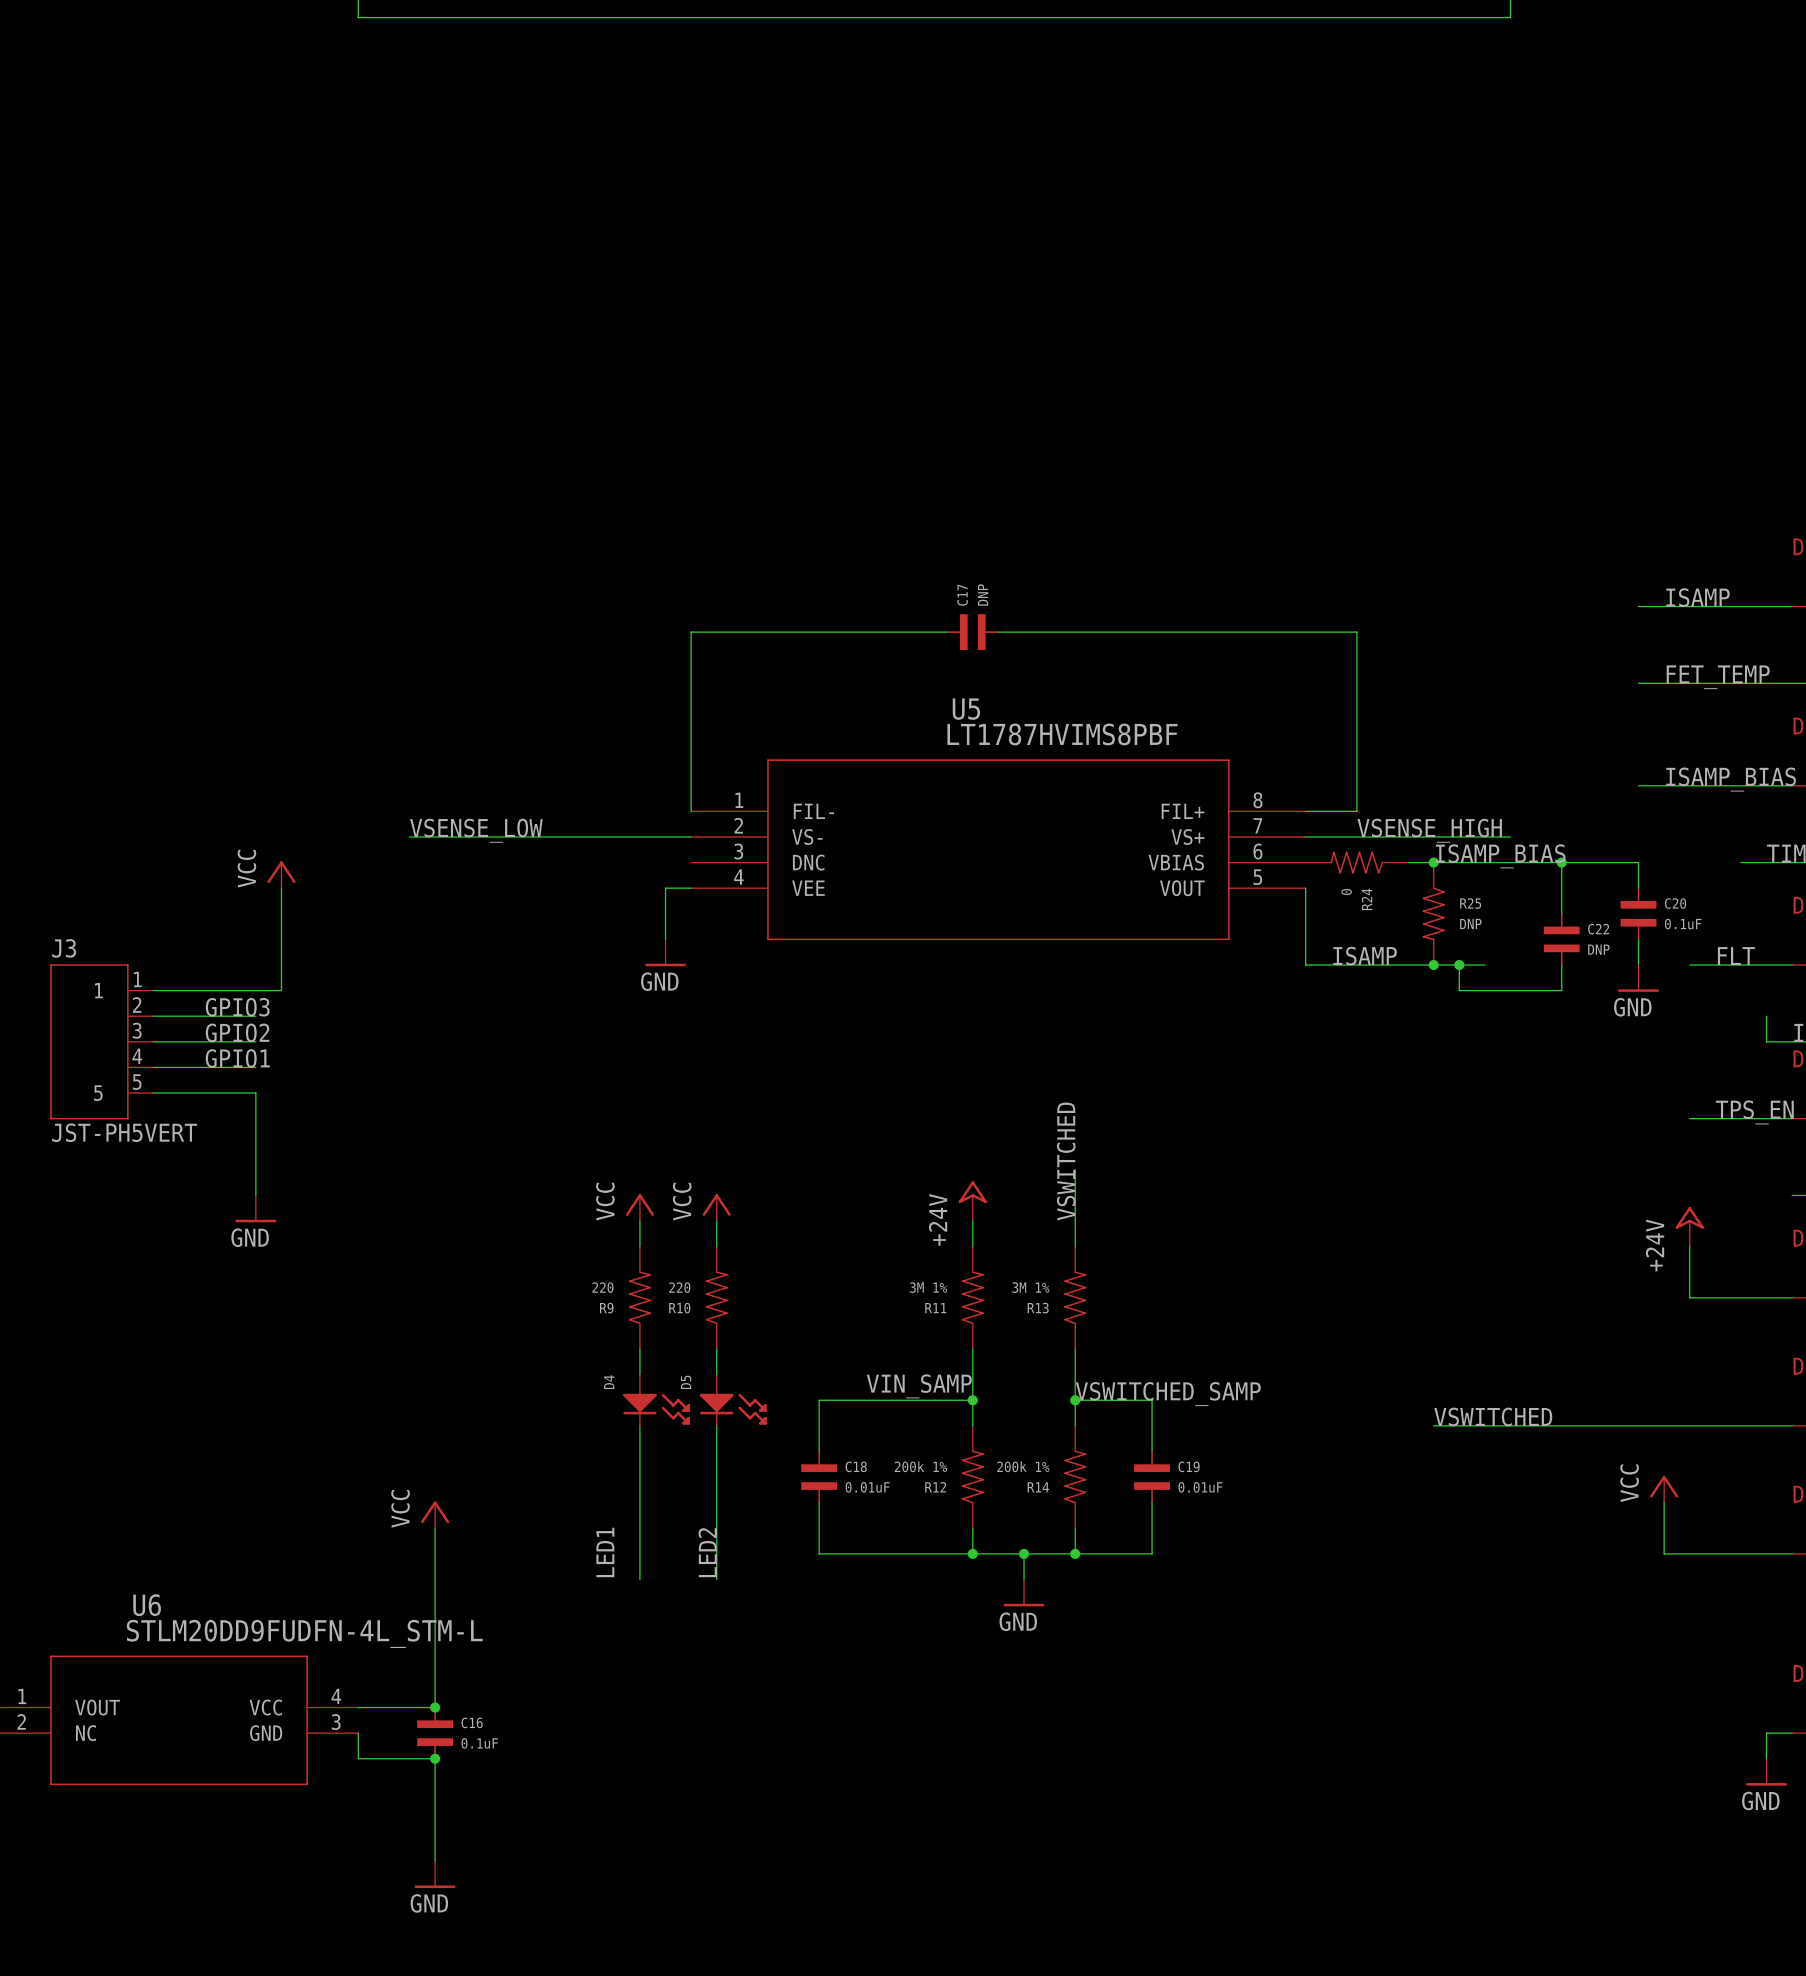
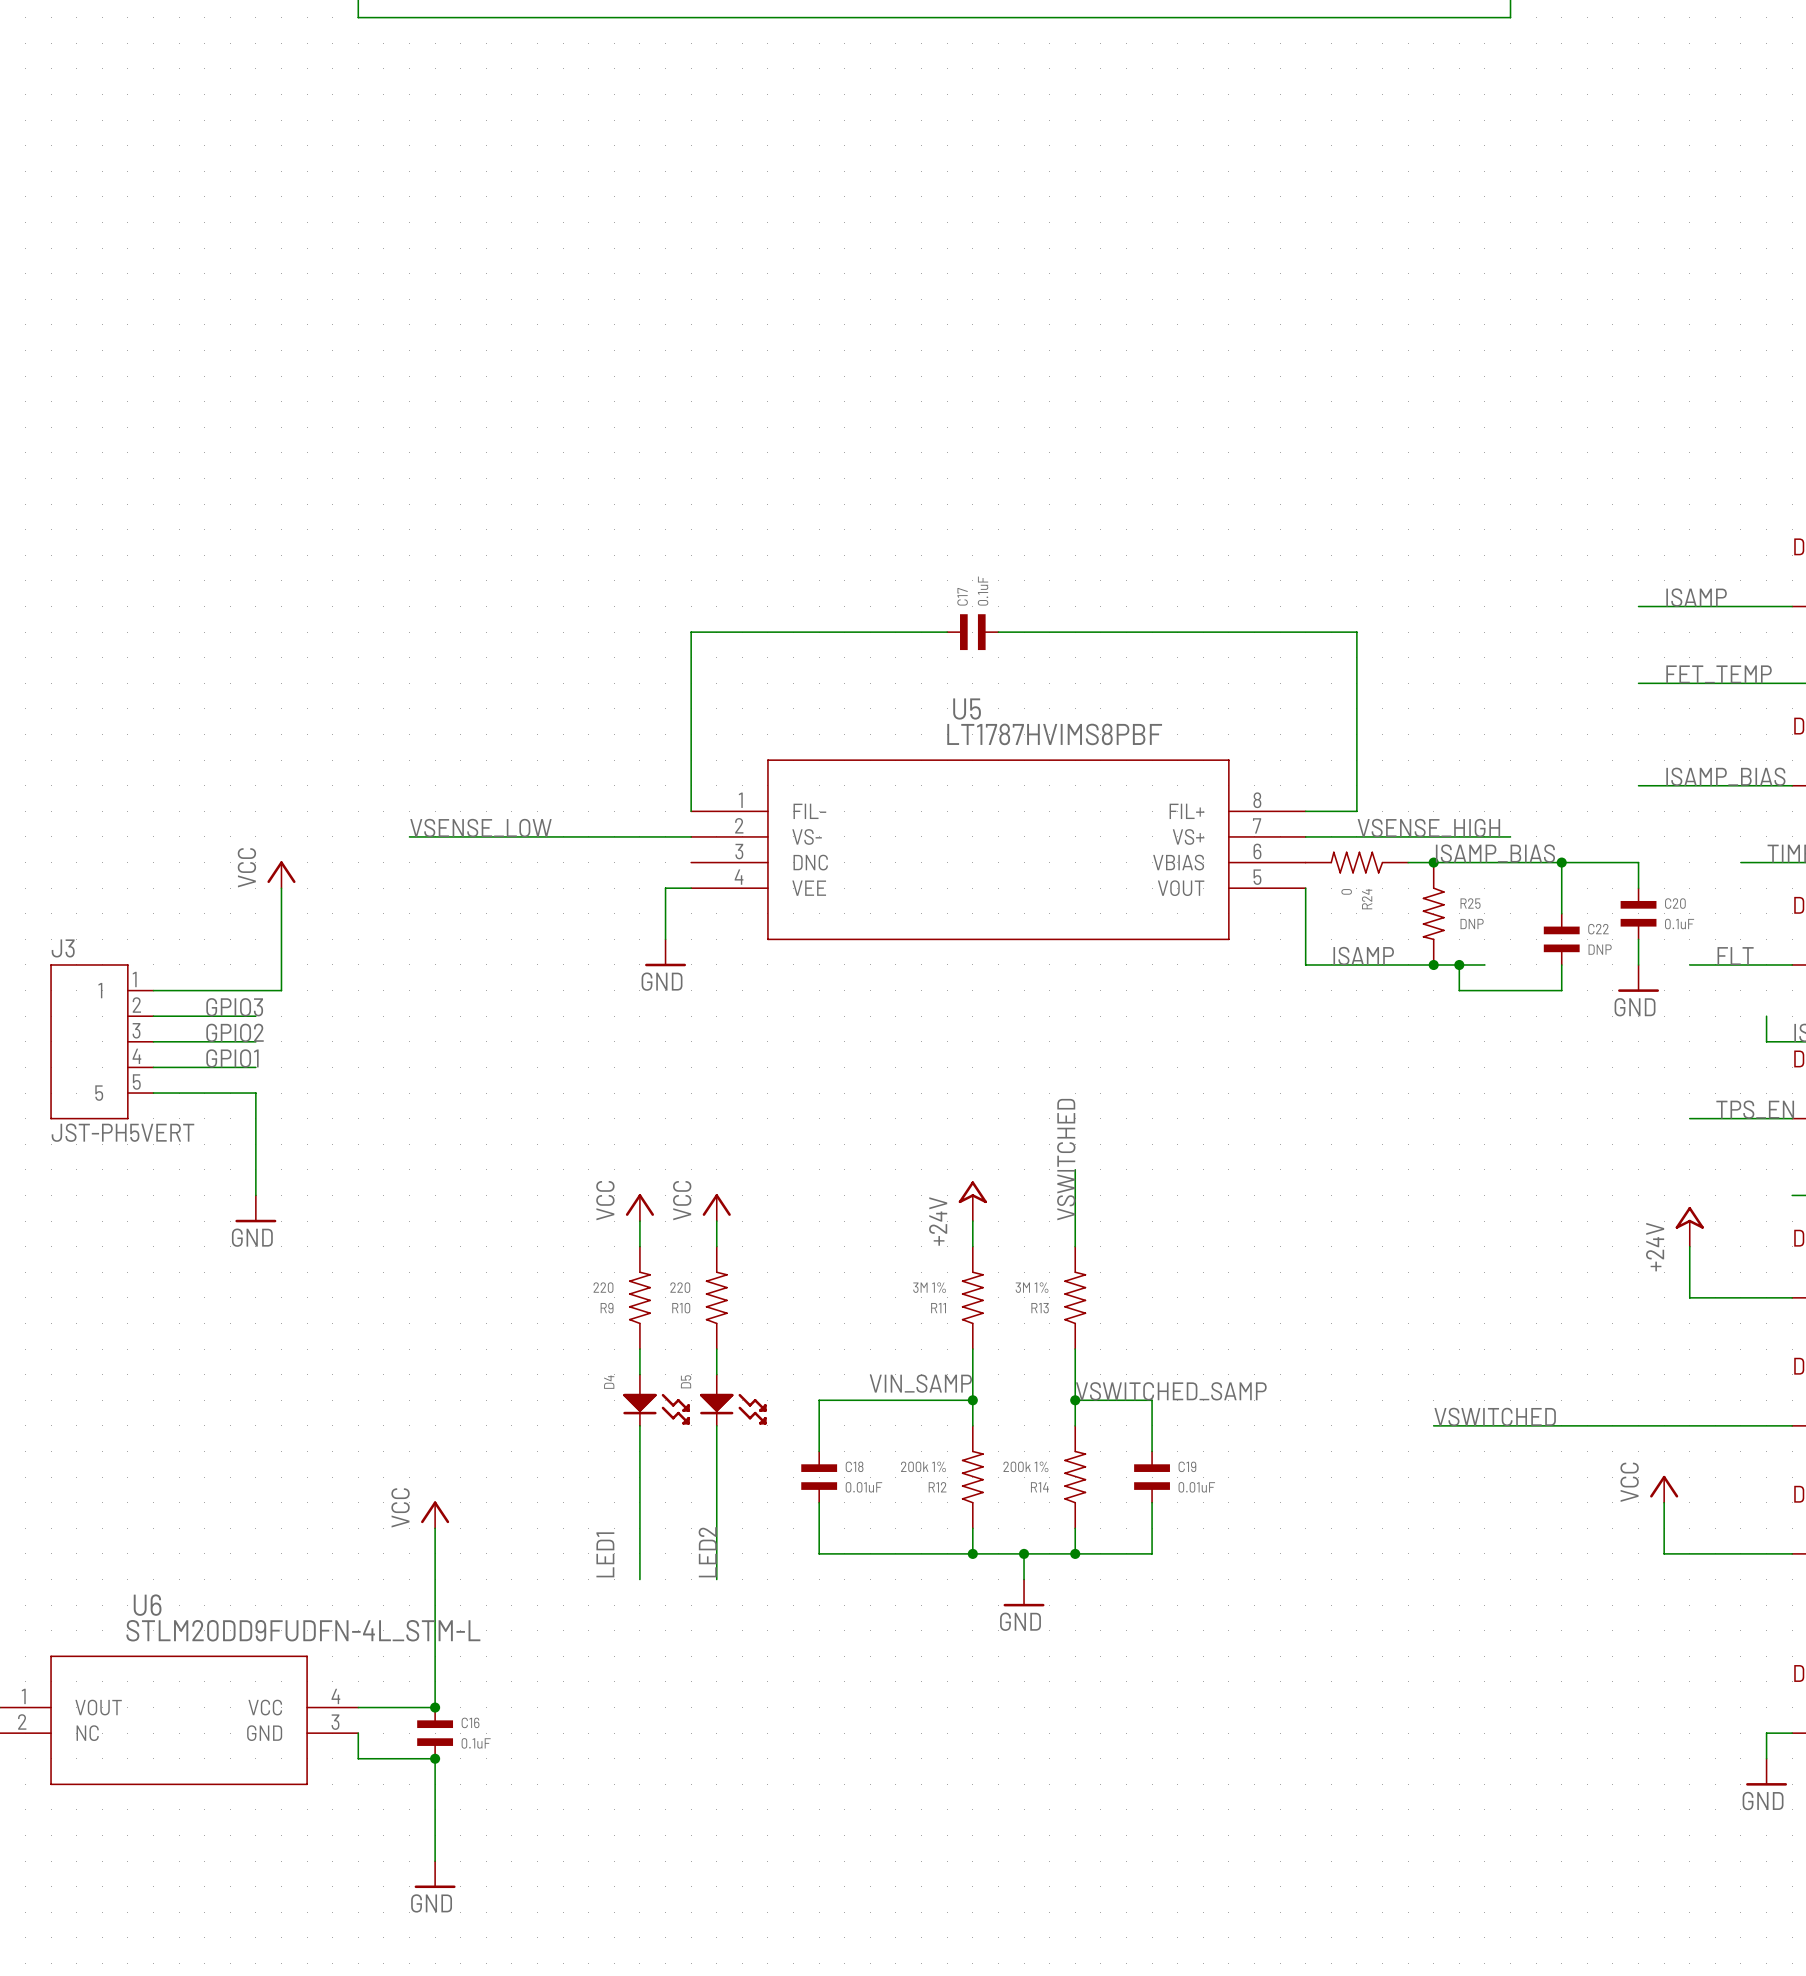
C17 value: DNP (983, 594) -> 0.1uF (983, 591)

